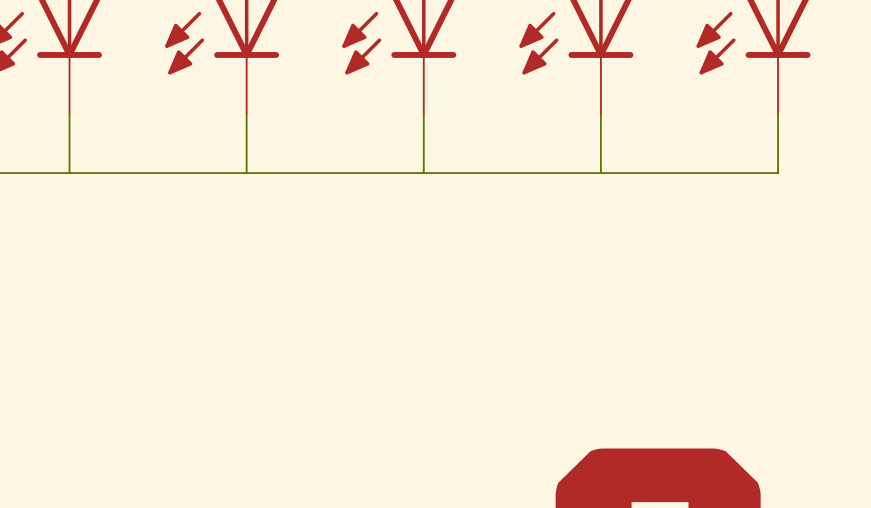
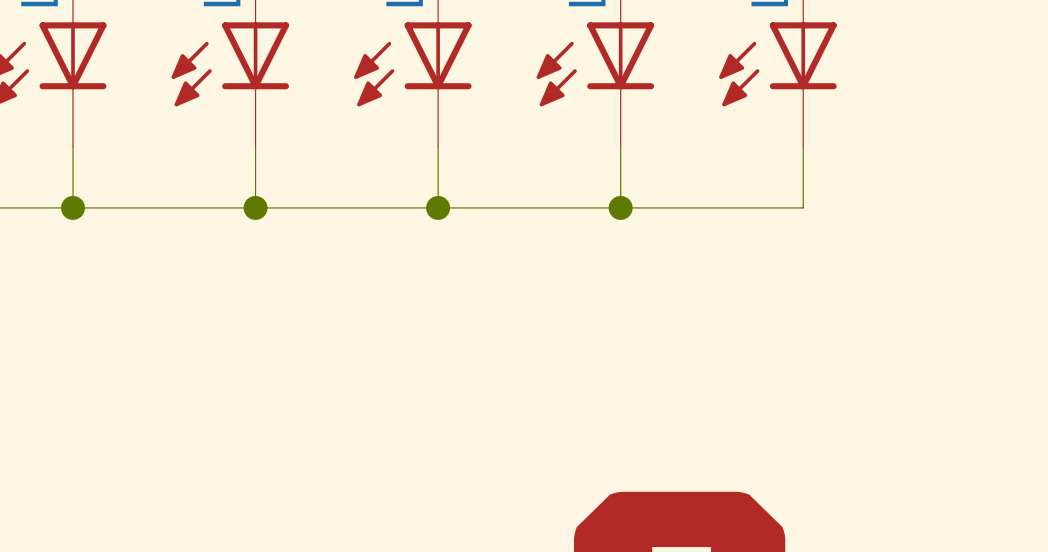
junction: none -> (73, 207)
junction: none -> (255, 207)
junction: none -> (438, 207)
junction: none -> (620, 207)

